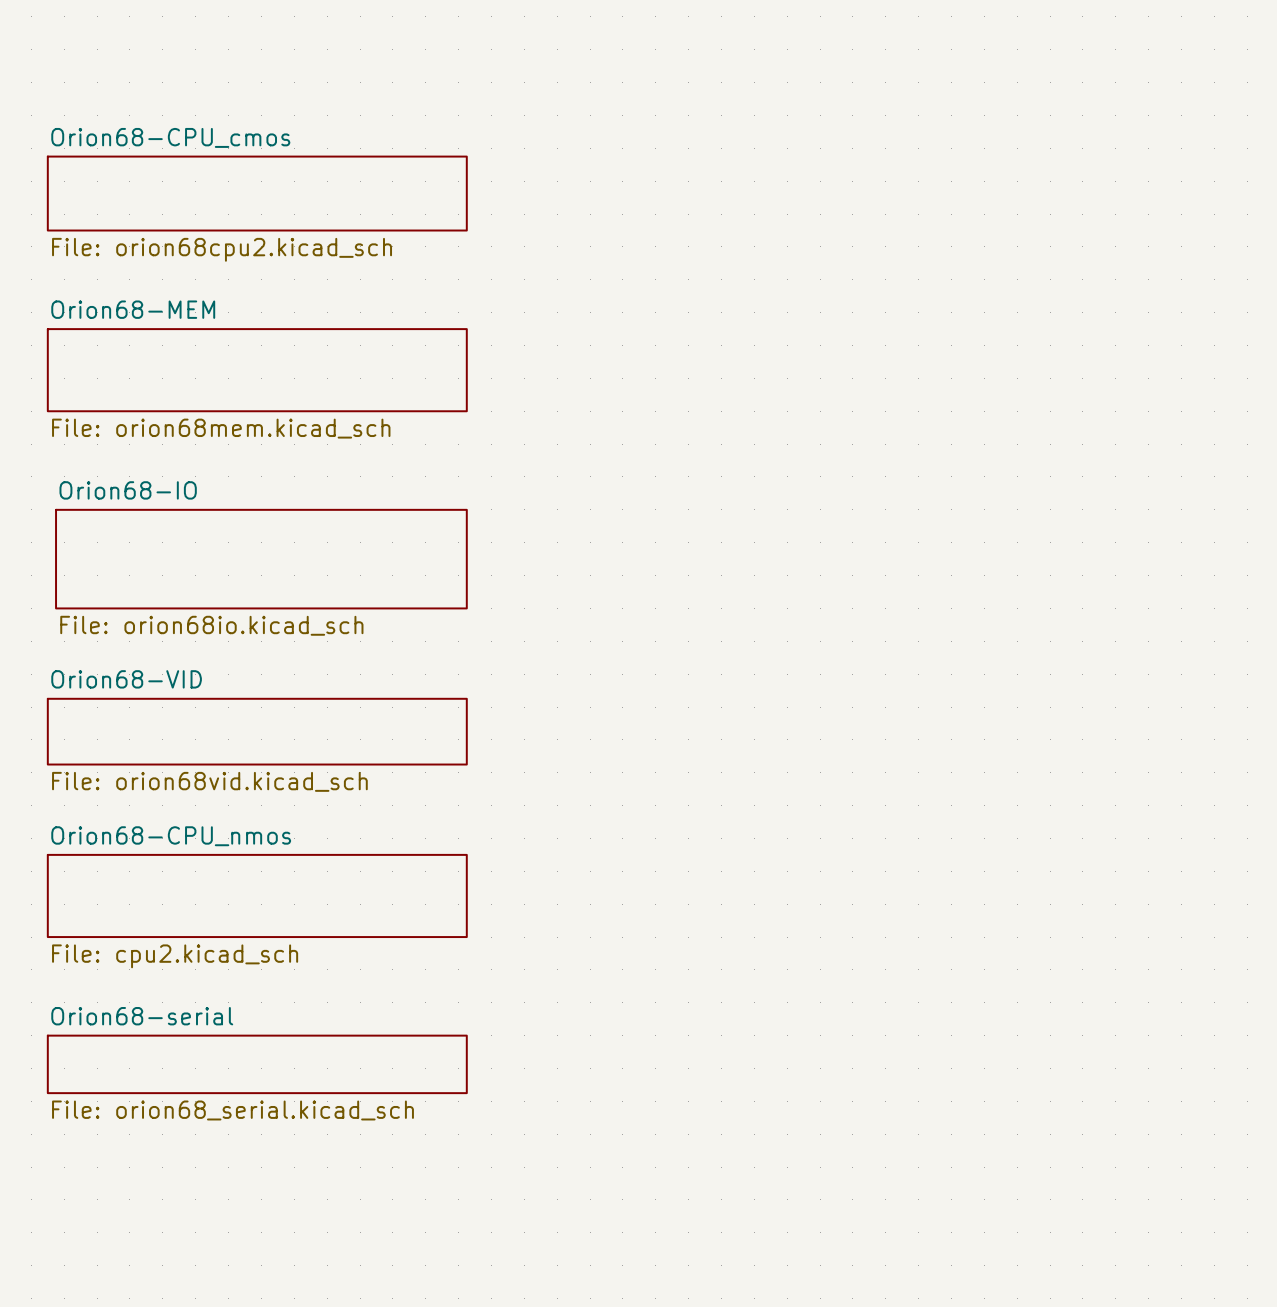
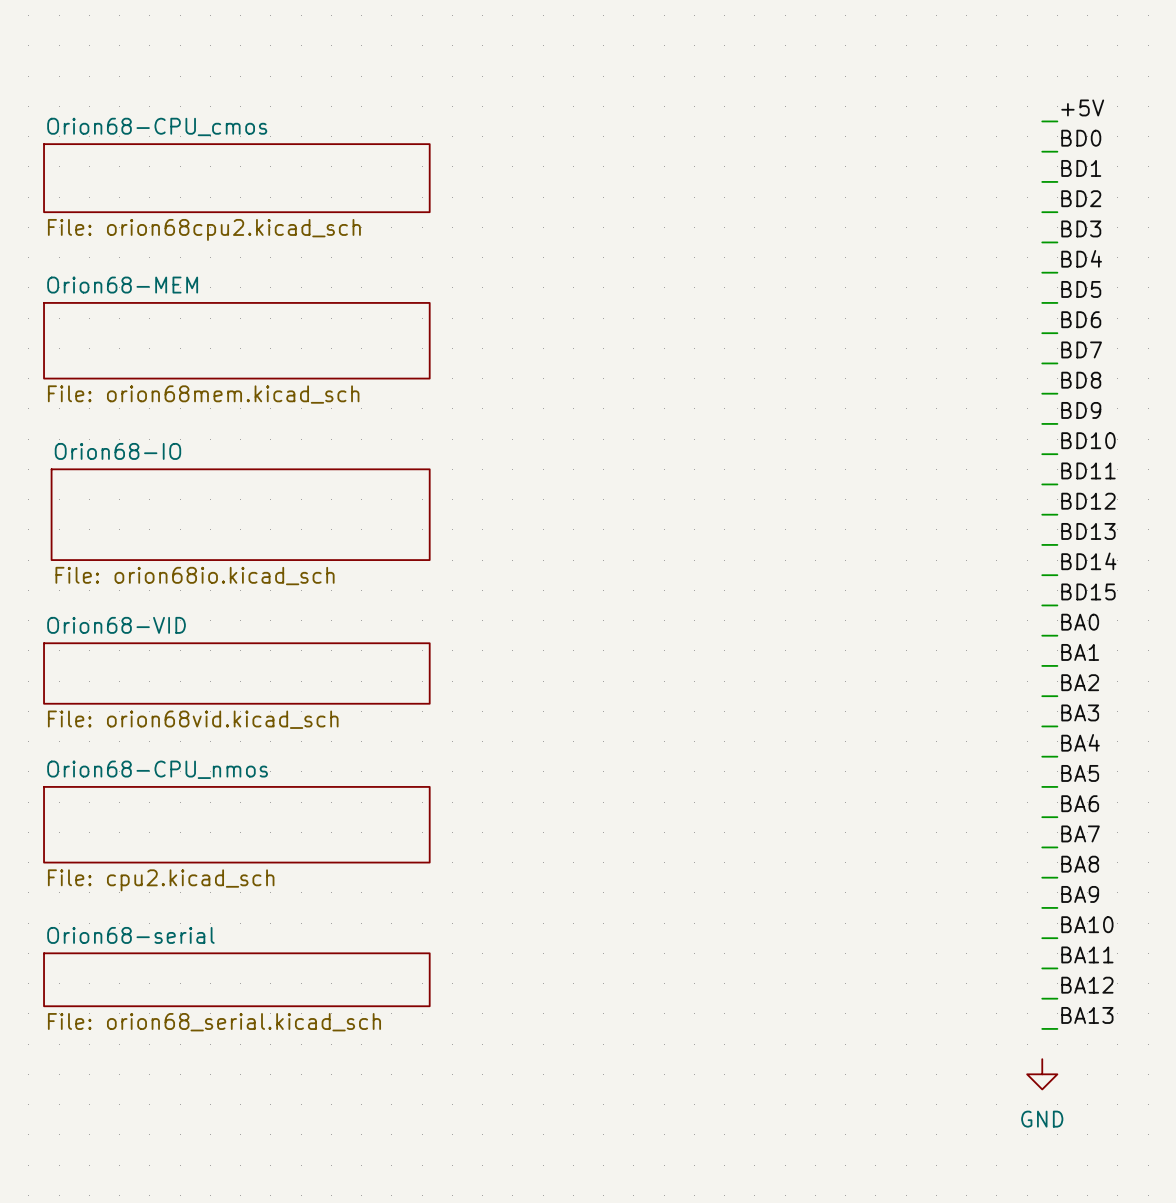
label: none -> +5V (1082, 107)
wire: none -> (1042, 121) (1057, 121)
label: none -> BD0 (1081, 138)
wire: none -> (1042, 151) (1057, 151)
label: none -> BD1 (1081, 168)
wire: none -> (1042, 181) (1057, 181)
label: none -> BD2 (1081, 198)
wire: none -> (1042, 212) (1057, 212)
label: none -> BD3 (1081, 228)
wire: none -> (1042, 242) (1057, 242)
label: none -> BD4 (1081, 258)
wire: none -> (1042, 272) (1057, 272)
label: none -> BD5 (1081, 289)
wire: none -> (1042, 302) (1057, 302)
label: none -> BD6 (1081, 319)
wire: none -> (1042, 333) (1057, 333)
label: none -> BD7 (1081, 349)
wire: none -> (1042, 363) (1057, 363)
label: none -> BD8 (1081, 380)
wire: none -> (1042, 393) (1057, 393)
label: none -> BD9 (1081, 410)
wire: none -> (1042, 423) (1057, 423)
label: none -> BD10 (1088, 440)
wire: none -> (1042, 454) (1057, 454)
label: none -> BD11 (1088, 470)
wire: none -> (1042, 484) (1057, 484)
label: none -> BD12 (1088, 501)
wire: none -> (1042, 514) (1057, 514)
label: none -> BD13 (1088, 531)
wire: none -> (1042, 544) (1057, 544)
label: none -> BD14 (1088, 561)
wire: none -> (1042, 575) (1057, 575)
label: none -> BD15 (1088, 591)
wire: none -> (1042, 605) (1057, 605)
label: none -> BA0 (1080, 622)
wire: none -> (1042, 635) (1057, 635)
label: none -> BA1 (1080, 652)
wire: none -> (1042, 665) (1057, 665)
label: none -> BA2 (1080, 682)
wire: none -> (1042, 696) (1057, 696)
label: none -> BA3 (1080, 712)
wire: none -> (1042, 726) (1057, 726)
label: none -> BA4 (1080, 742)
wire: none -> (1042, 756) (1057, 756)
label: none -> BA5 (1080, 773)
wire: none -> (1042, 786) (1057, 786)
label: none -> BA6 (1080, 803)
wire: none -> (1042, 817) (1057, 817)
label: none -> BA7 (1080, 833)
wire: none -> (1042, 847) (1057, 847)
label: none -> BA8 (1080, 864)
wire: none -> (1042, 877) (1057, 877)
label: none -> BA9 (1080, 894)
wire: none -> (1042, 907) (1057, 907)
label: none -> BA10 (1087, 924)
wire: none -> (1042, 938) (1057, 938)
label: none -> BA11 (1087, 954)
wire: none -> (1042, 968) (1057, 968)
label: none -> BA12 (1087, 985)
wire: none -> (1042, 998) (1057, 998)
label: none -> BA13 (1087, 1015)
wire: none -> (1042, 1028) (1057, 1028)
power symbol: none -> GND (1042, 1074)

